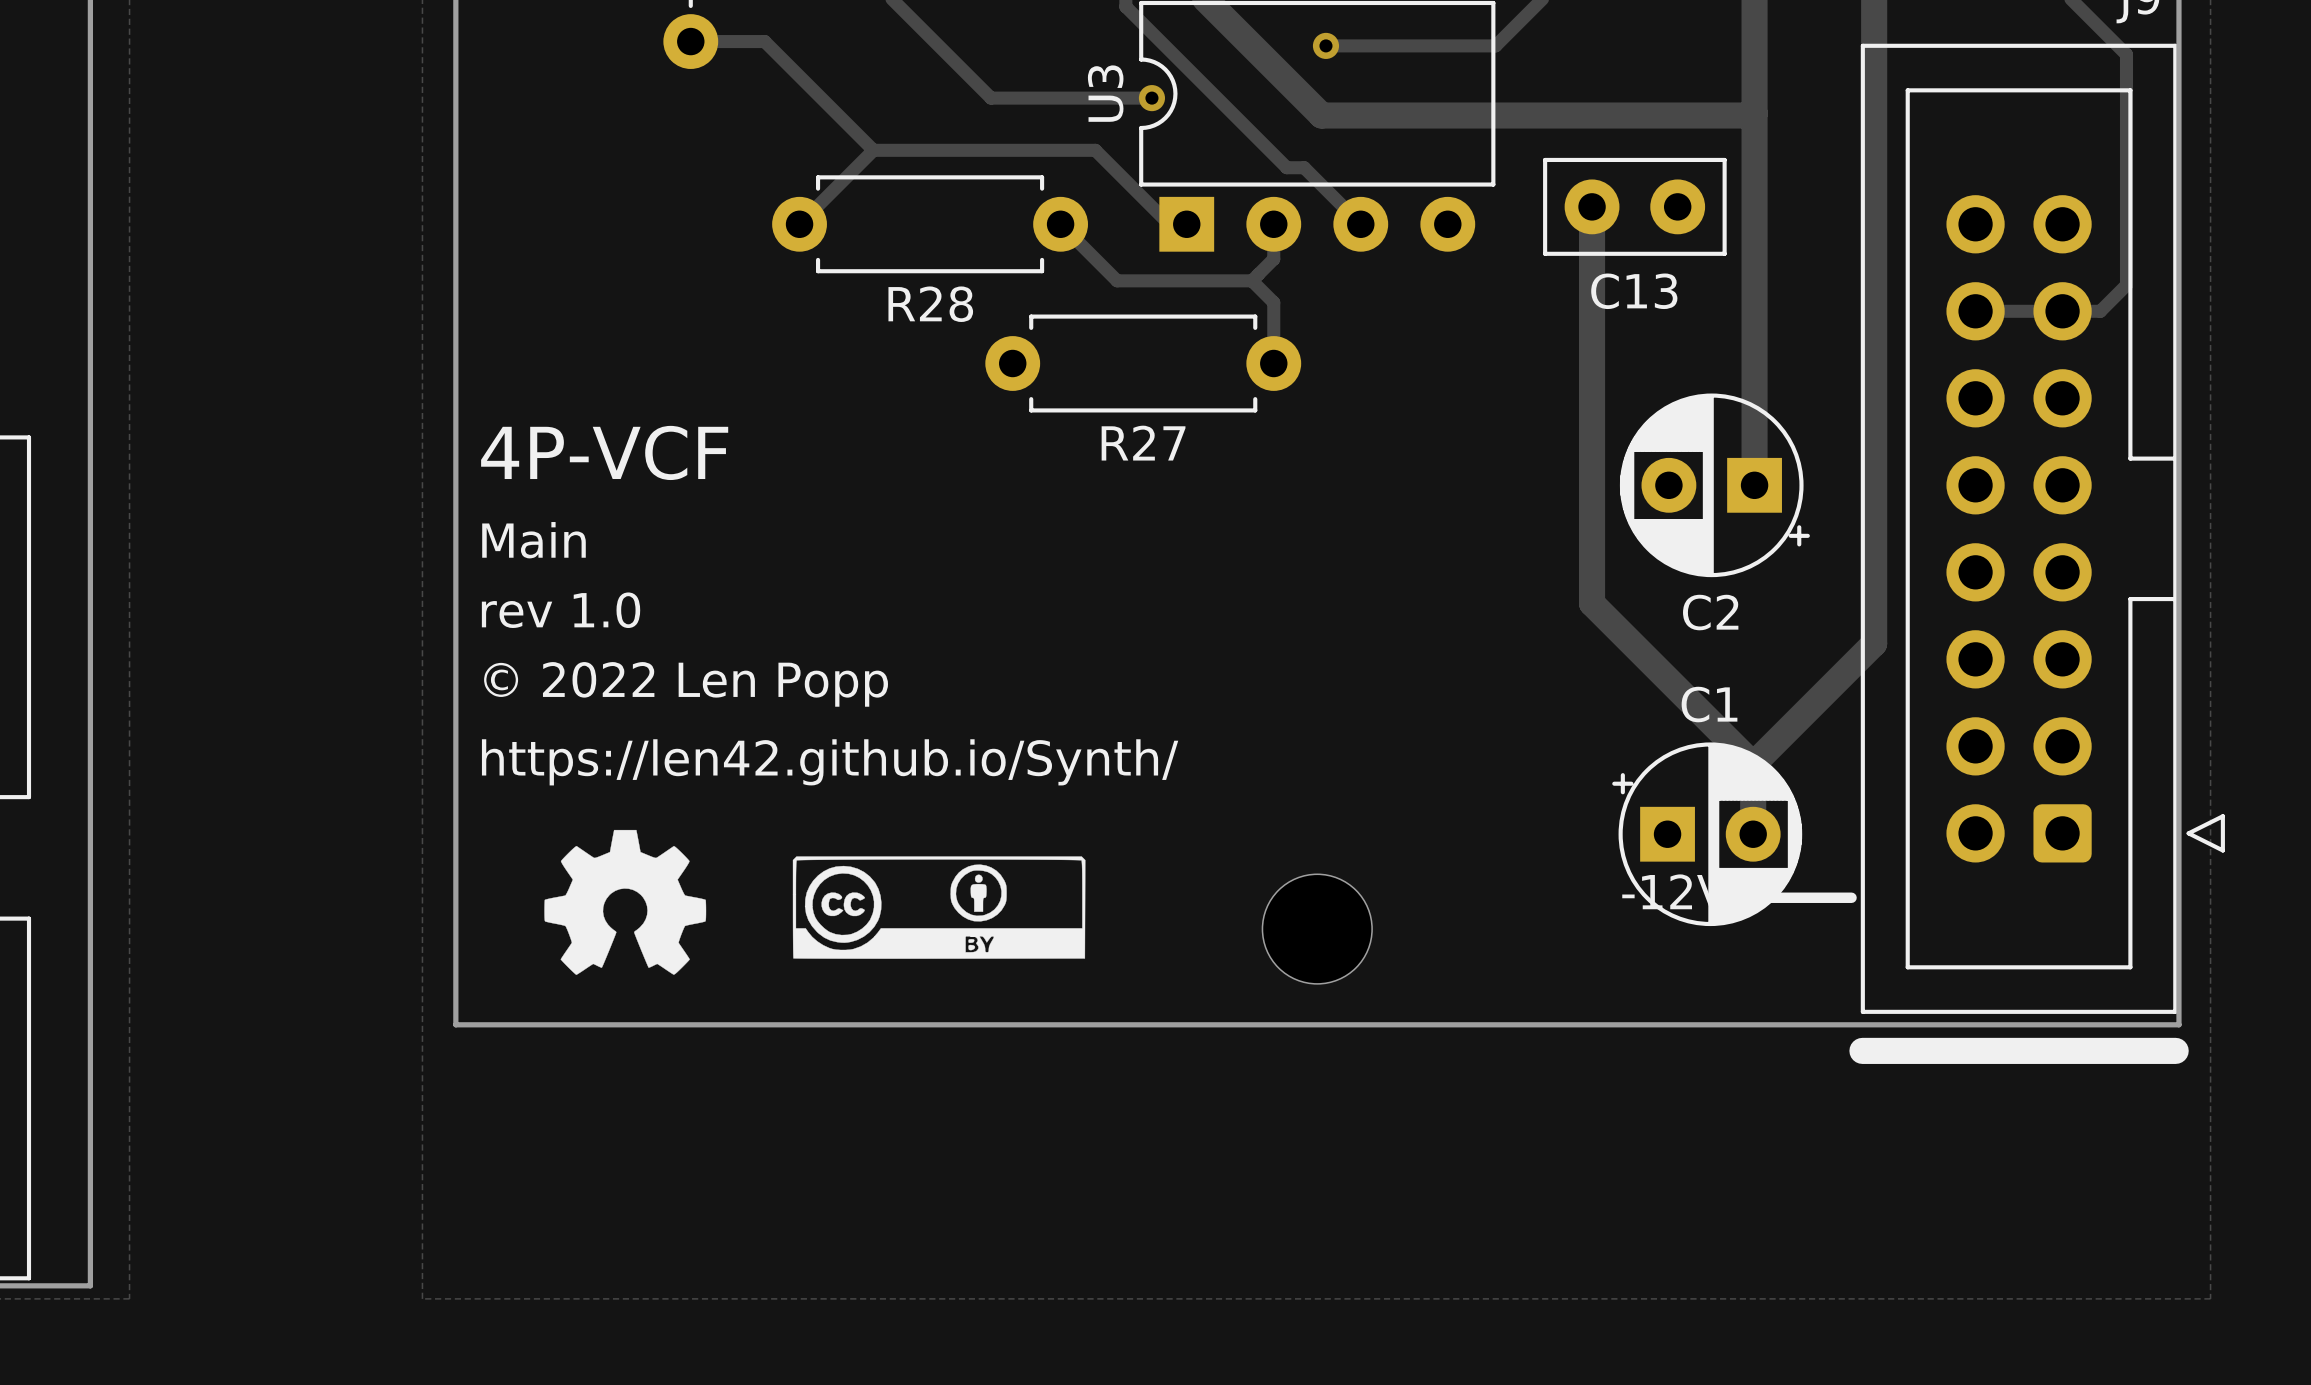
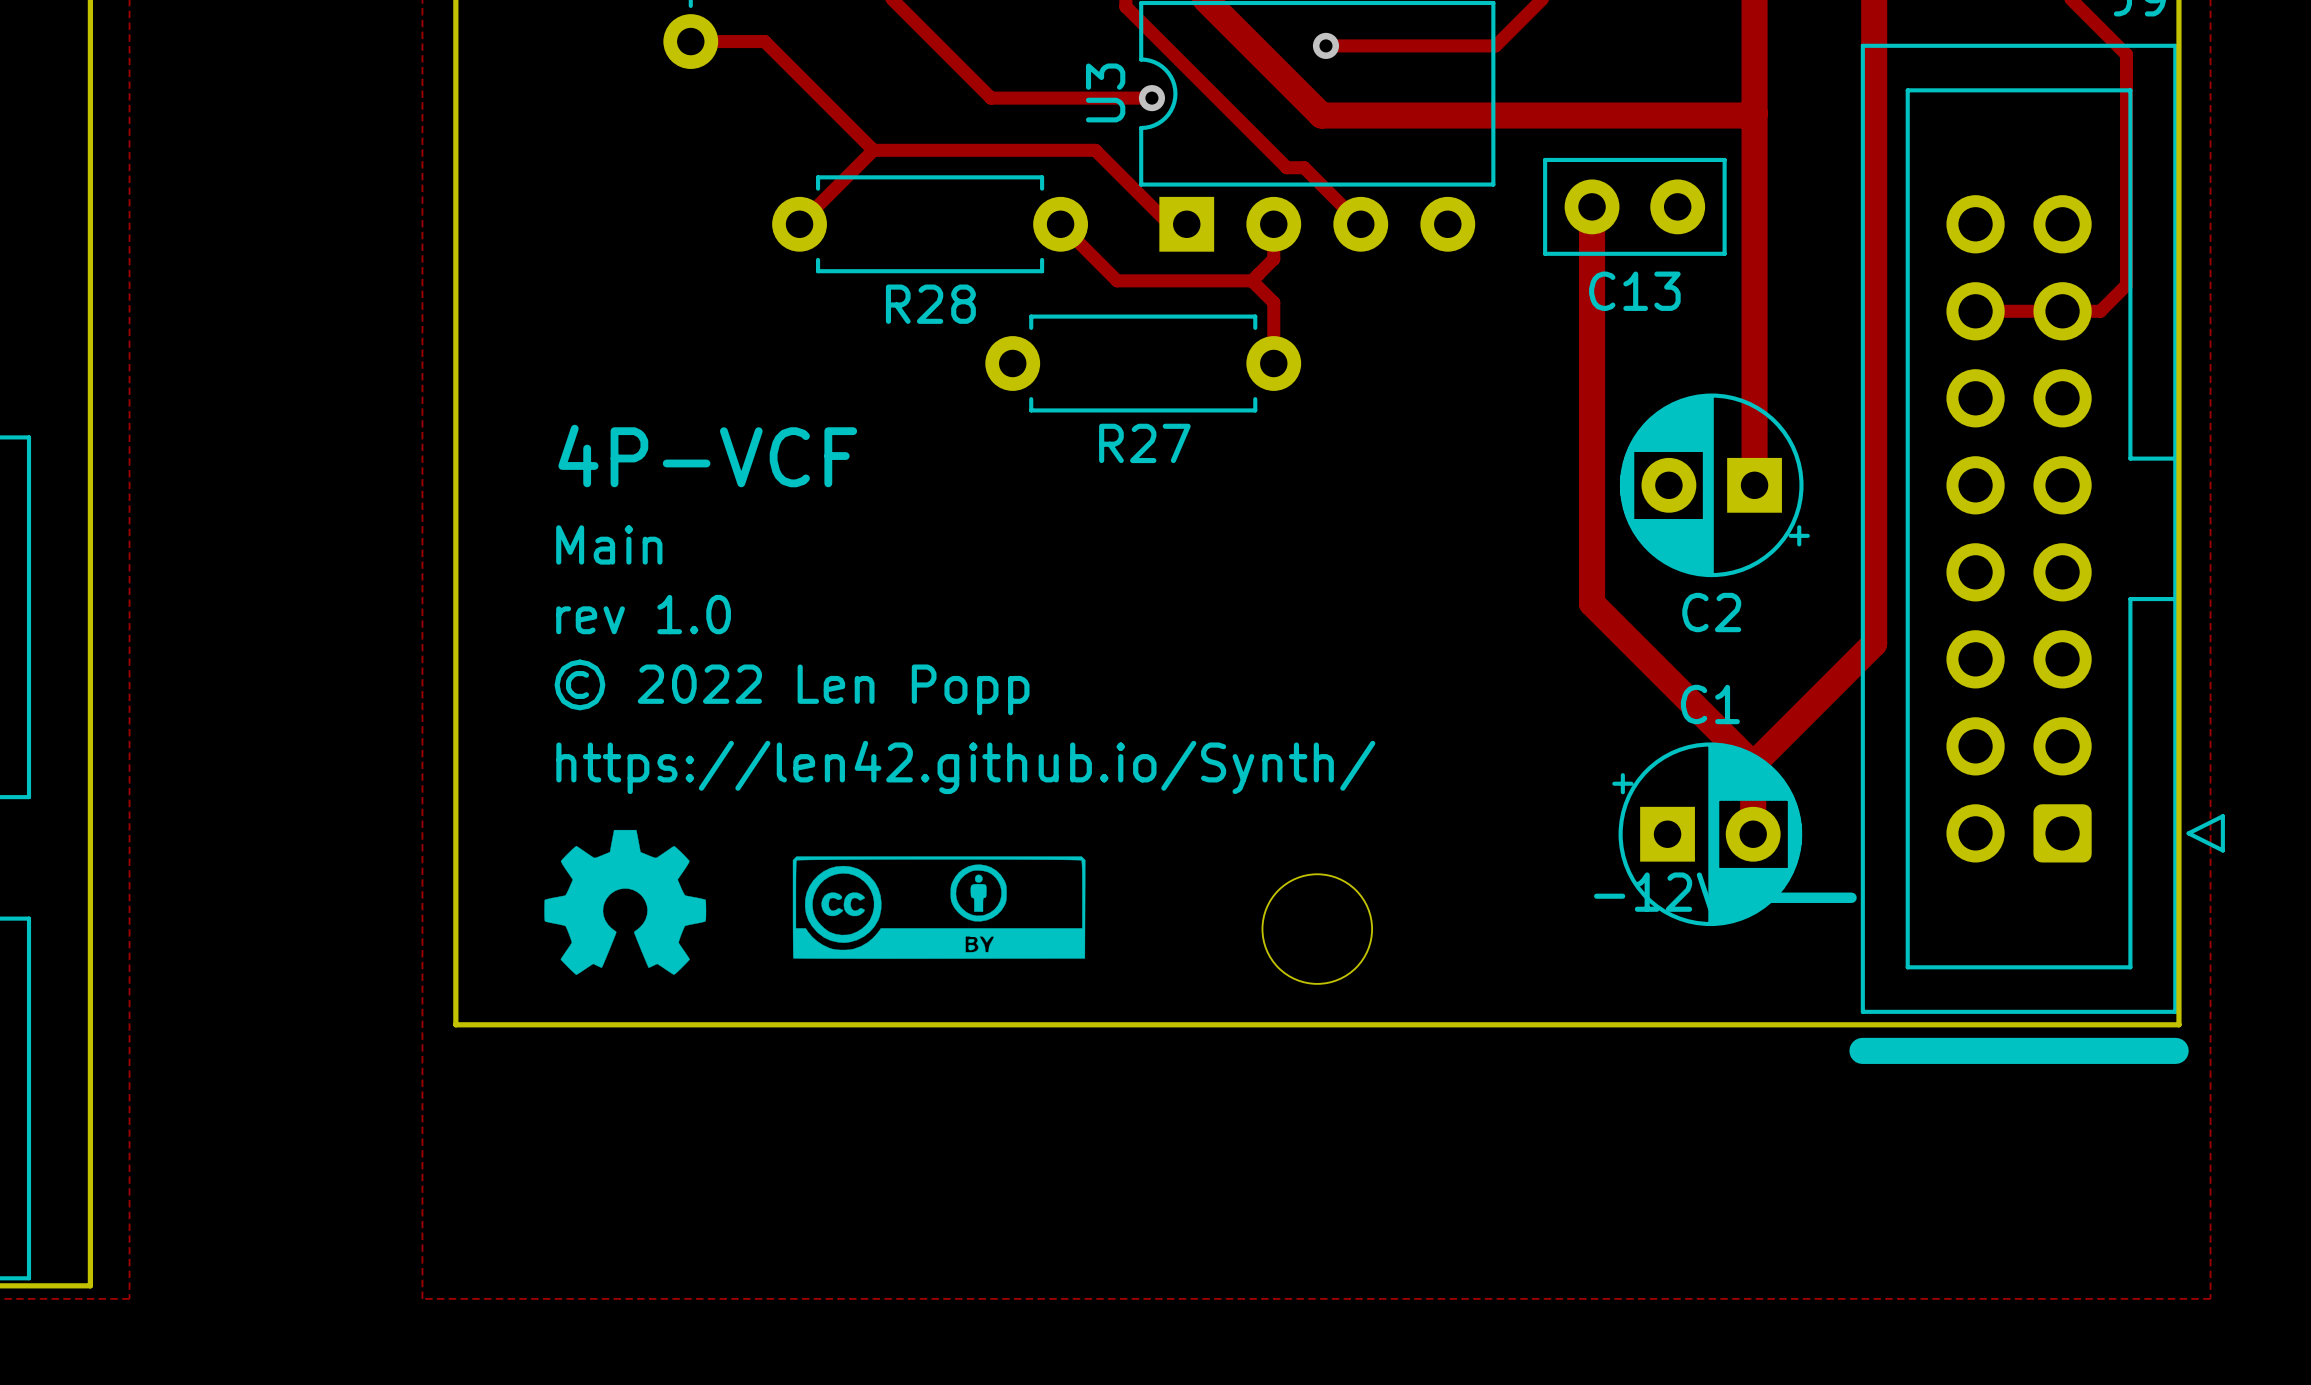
text position: 4P-VCF (604, 452) -> 4P-VCF (707, 456)
text position: Main (533, 540) -> Main (609, 544)
text position: rev 1.0 (561, 610) -> rev 1.0 (643, 614)
text position: © 2022 Len Popp (686, 684) -> © 2022 Len Popp (792, 687)
text position: https://len42.github.io/Synth/ (830, 762) -> https://len42.github.io/Synth/ (965, 767)

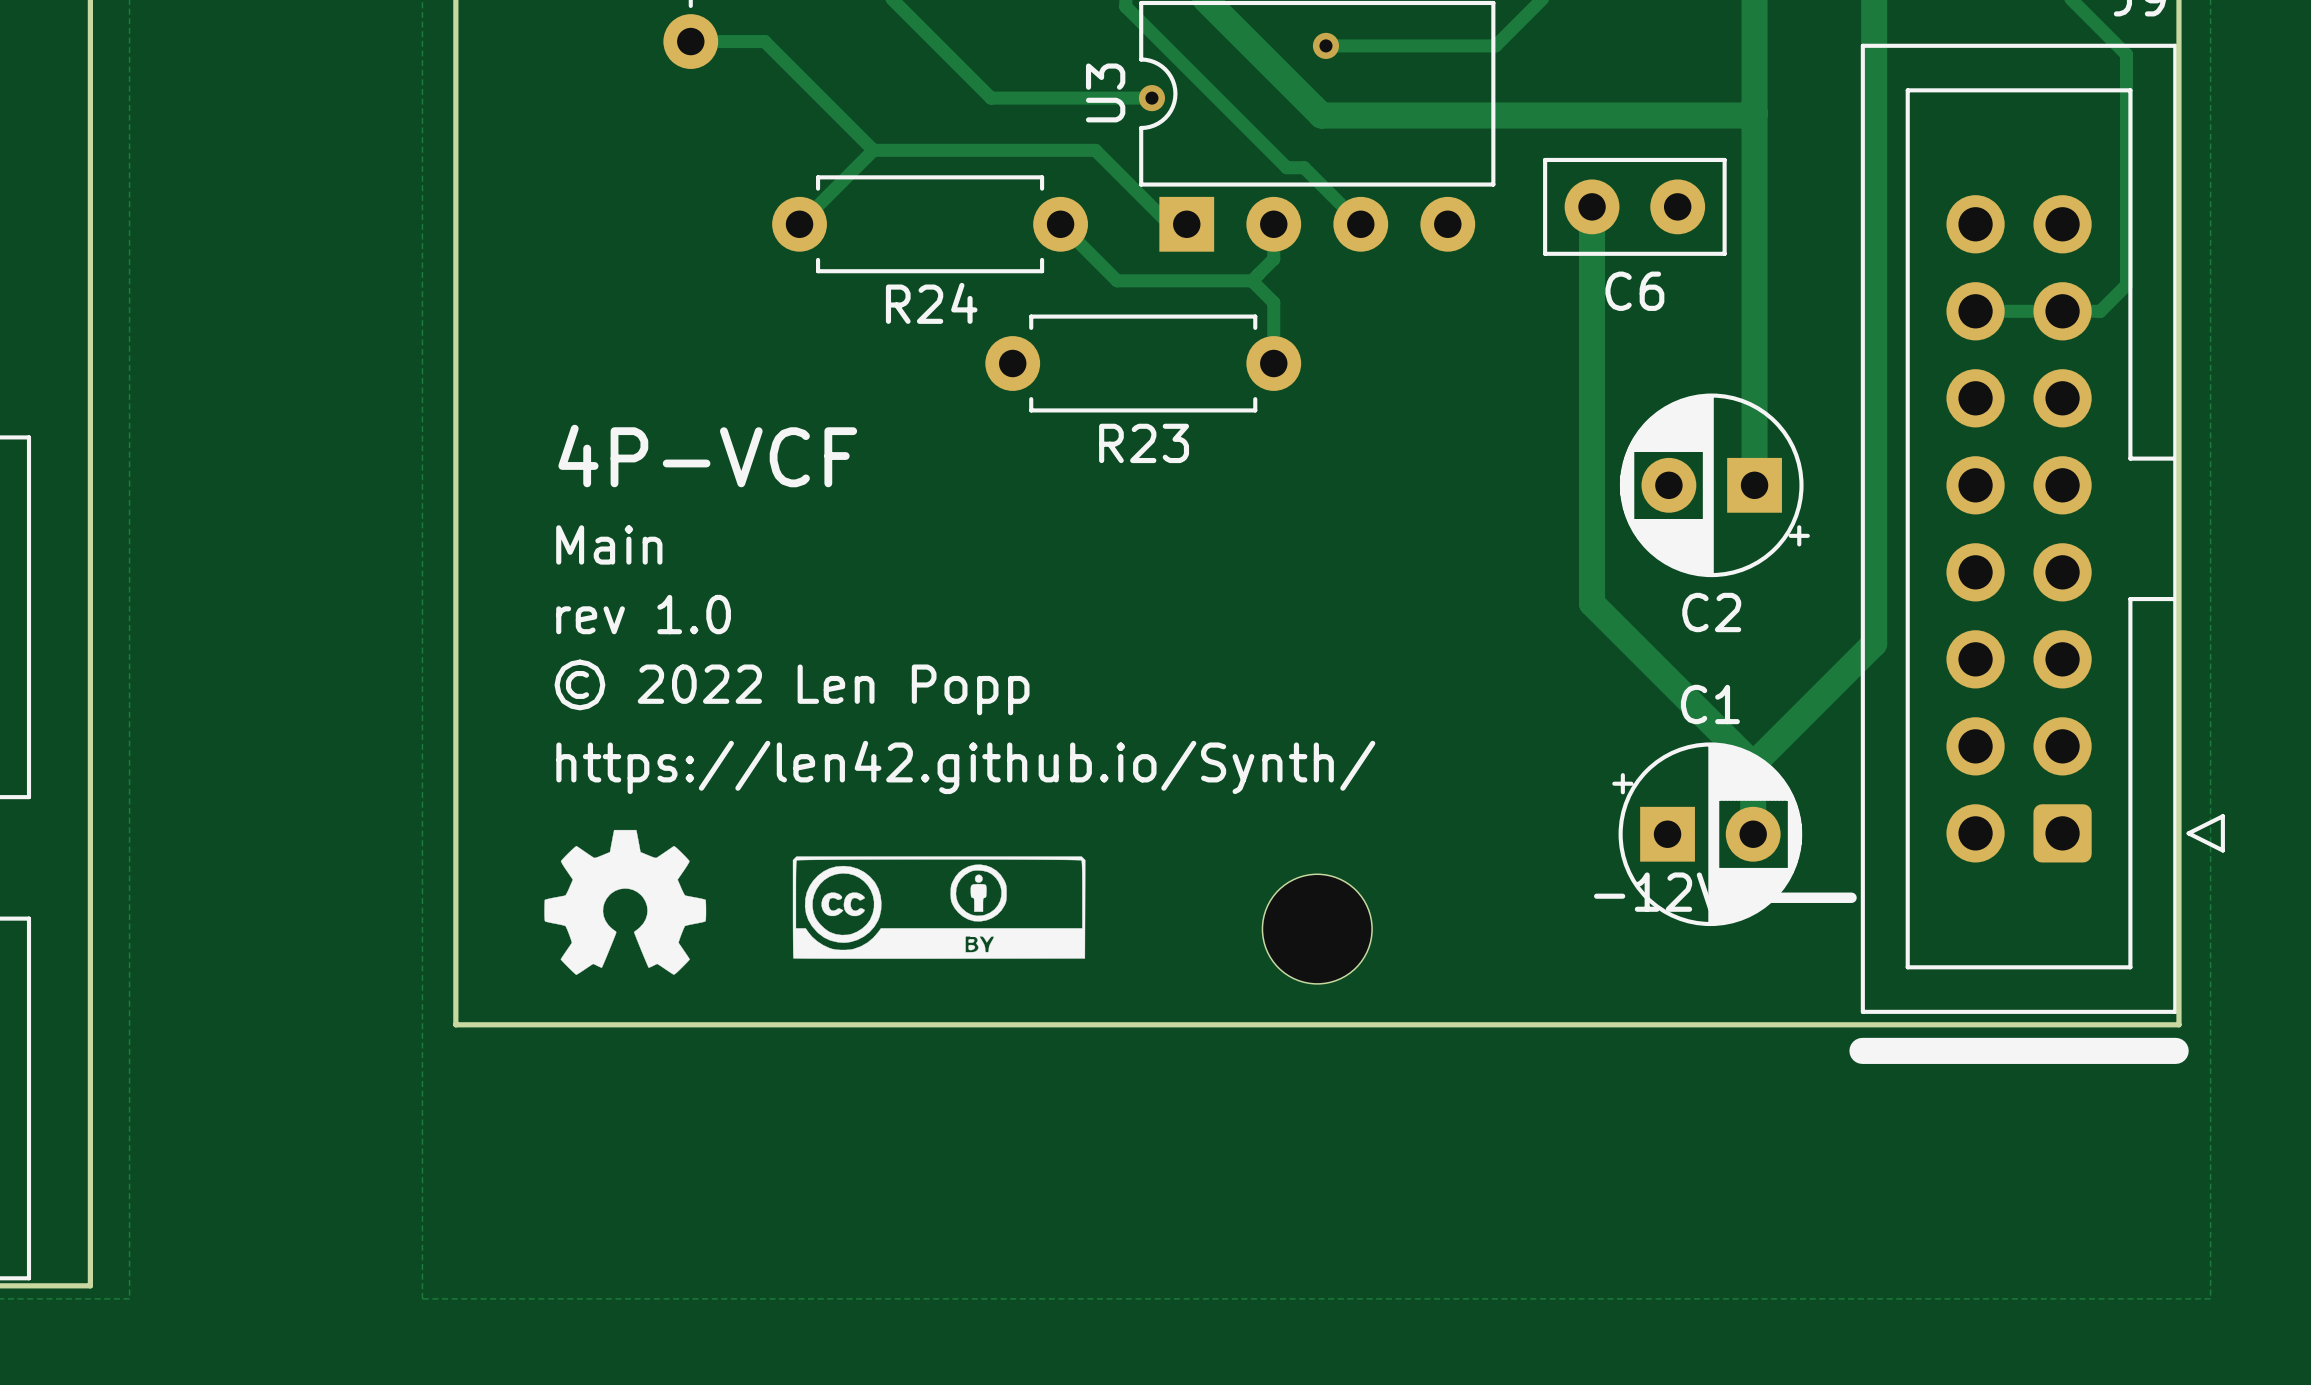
C13 name: C13 (1634, 291) -> C6 (1634, 291)
R28 name: R28 (930, 304) -> R24 (931, 303)
R27 name: R27 (1144, 443) -> R23 (1144, 443)

